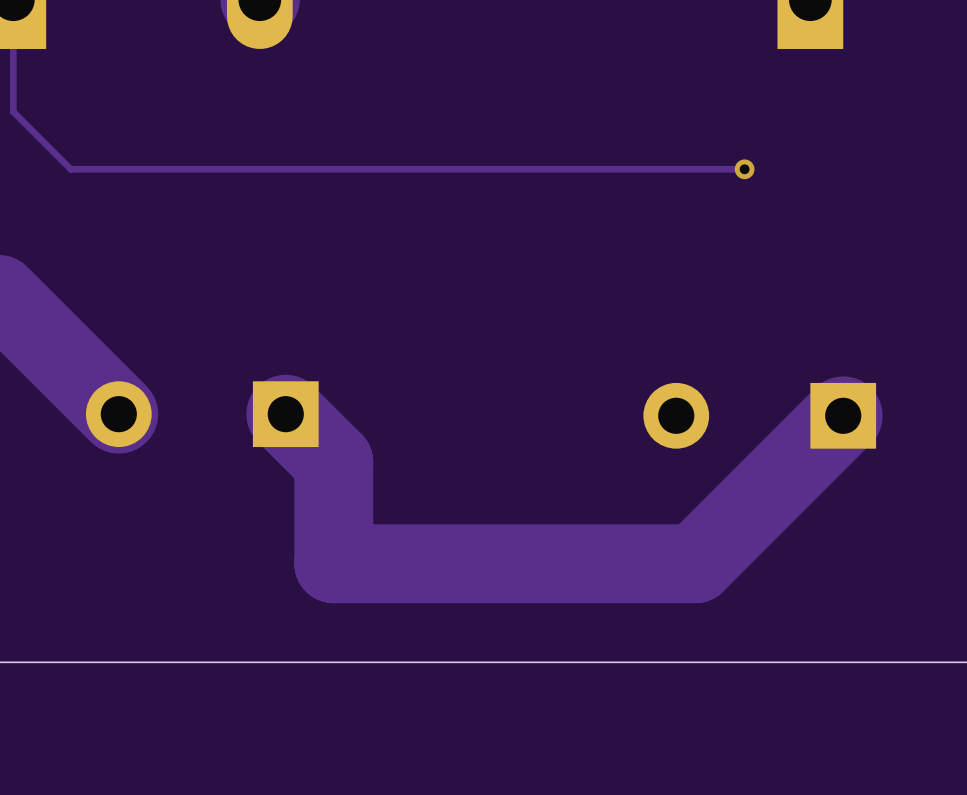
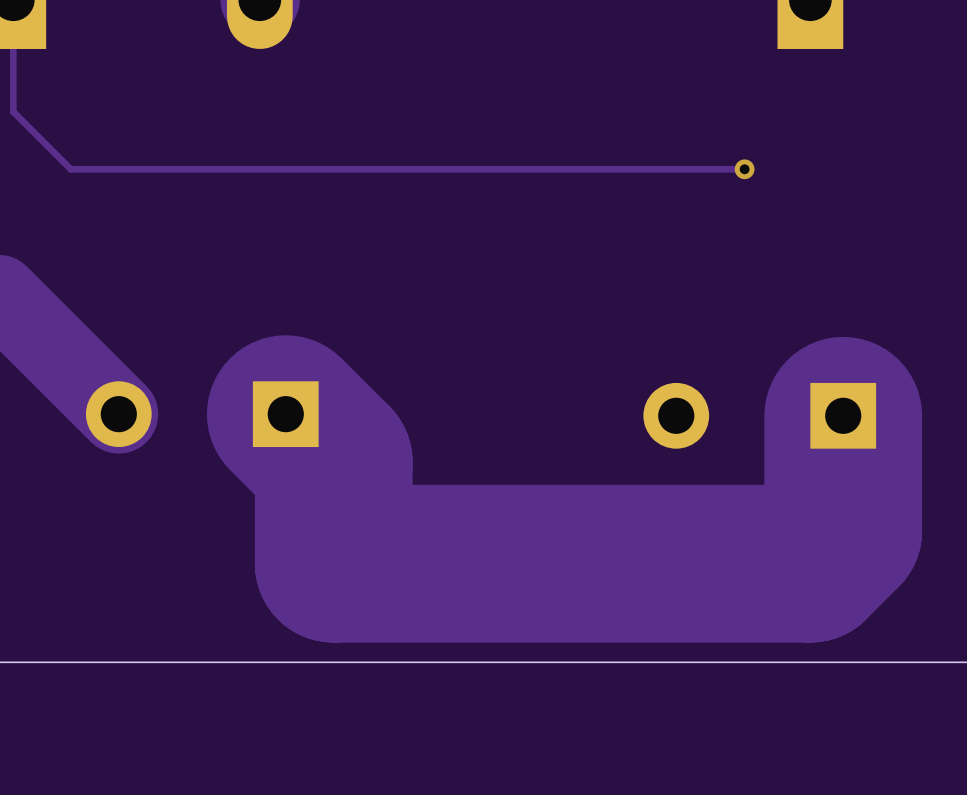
track width: thin (285, 414) (333, 462) (333, 563) (695, 563) -> thick (285, 414) (333, 462) (333, 563) (695, 563)
track: (843, 415) (695, 563) -> (843, 415) (843, 530) (810, 563) (695, 563)

